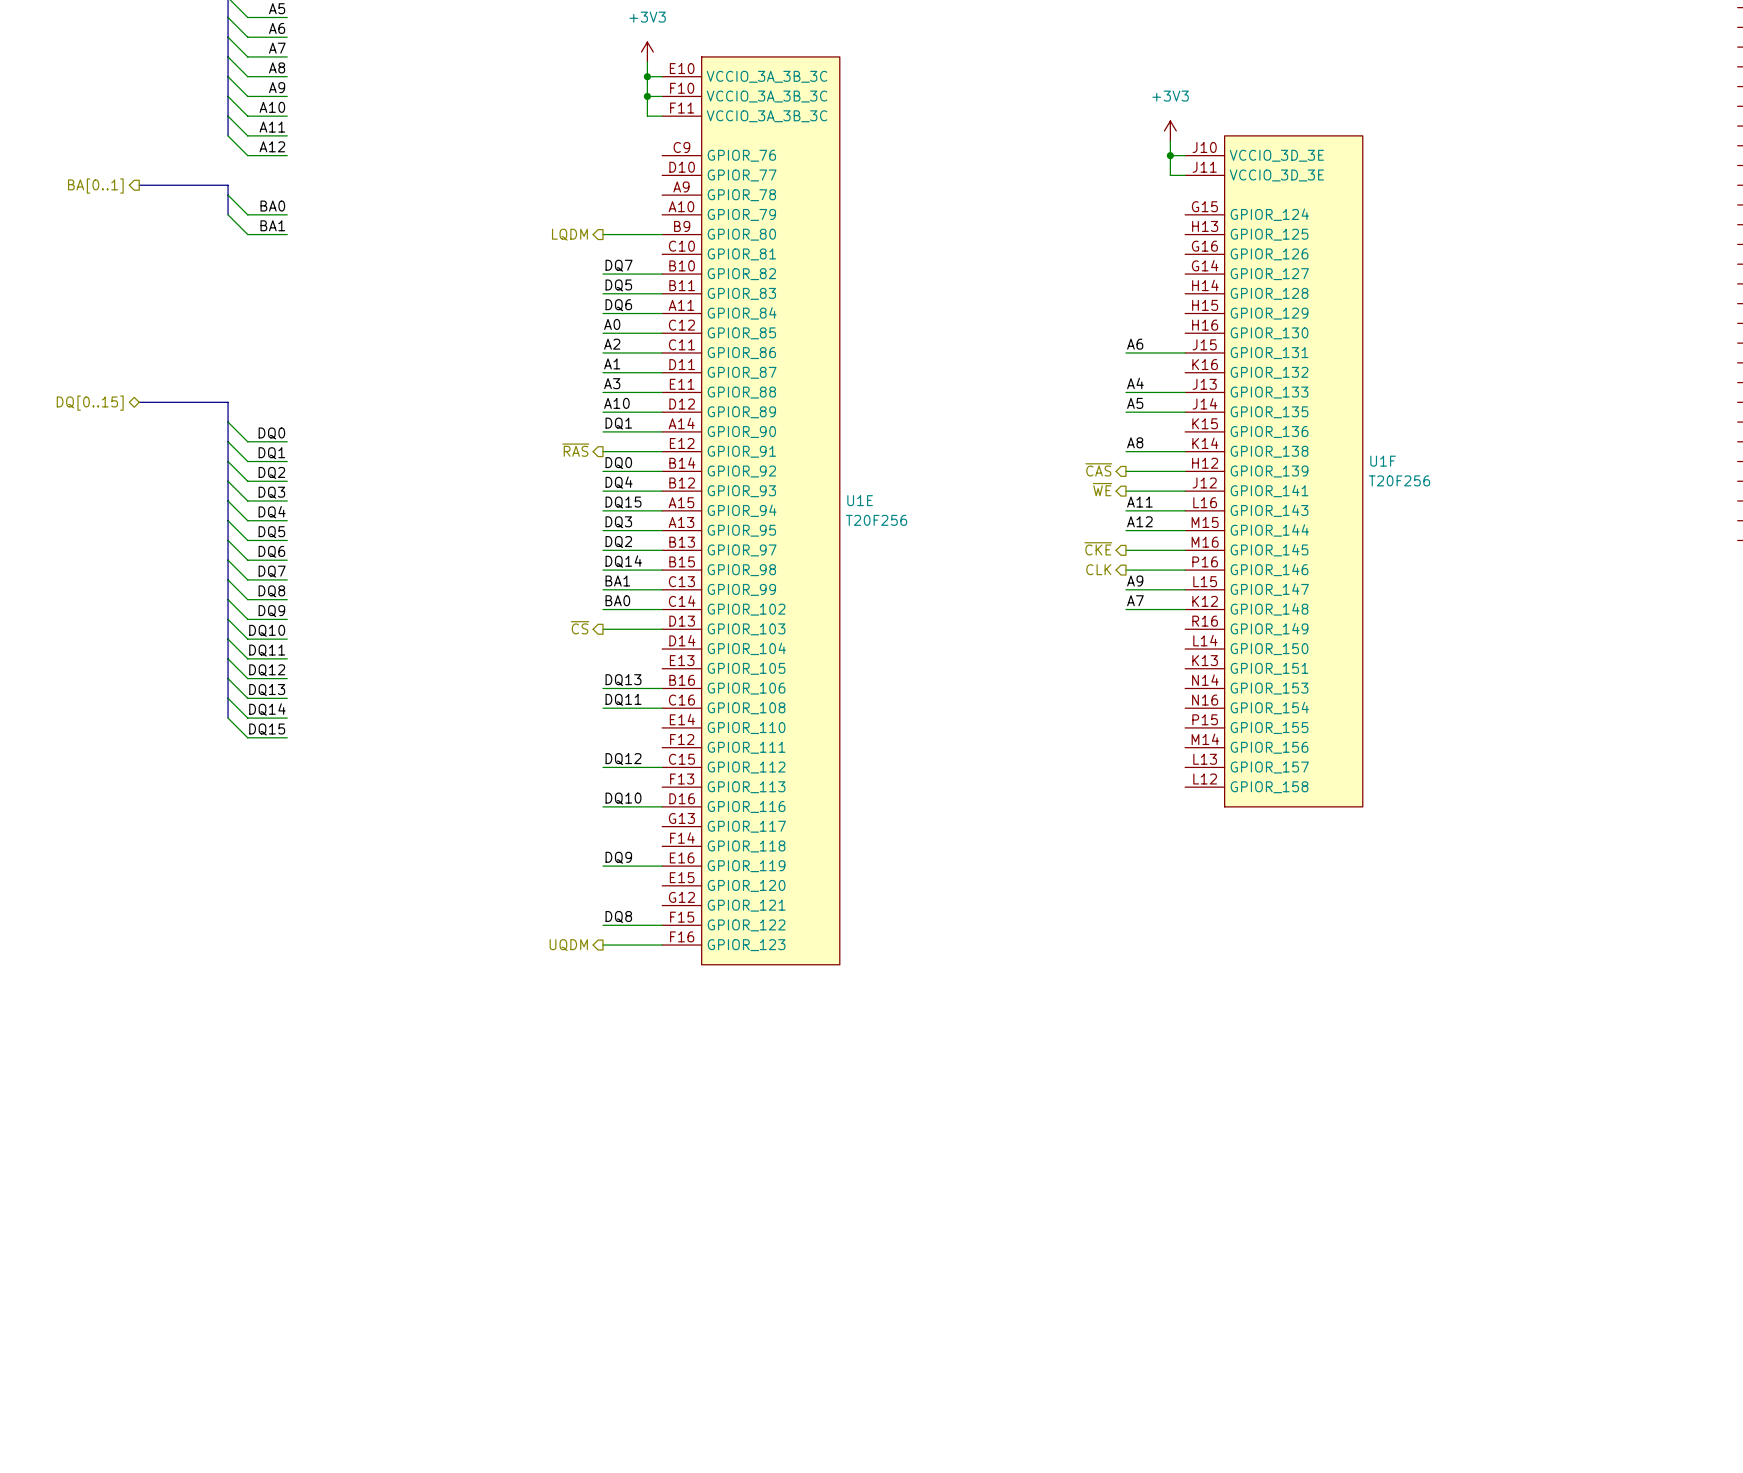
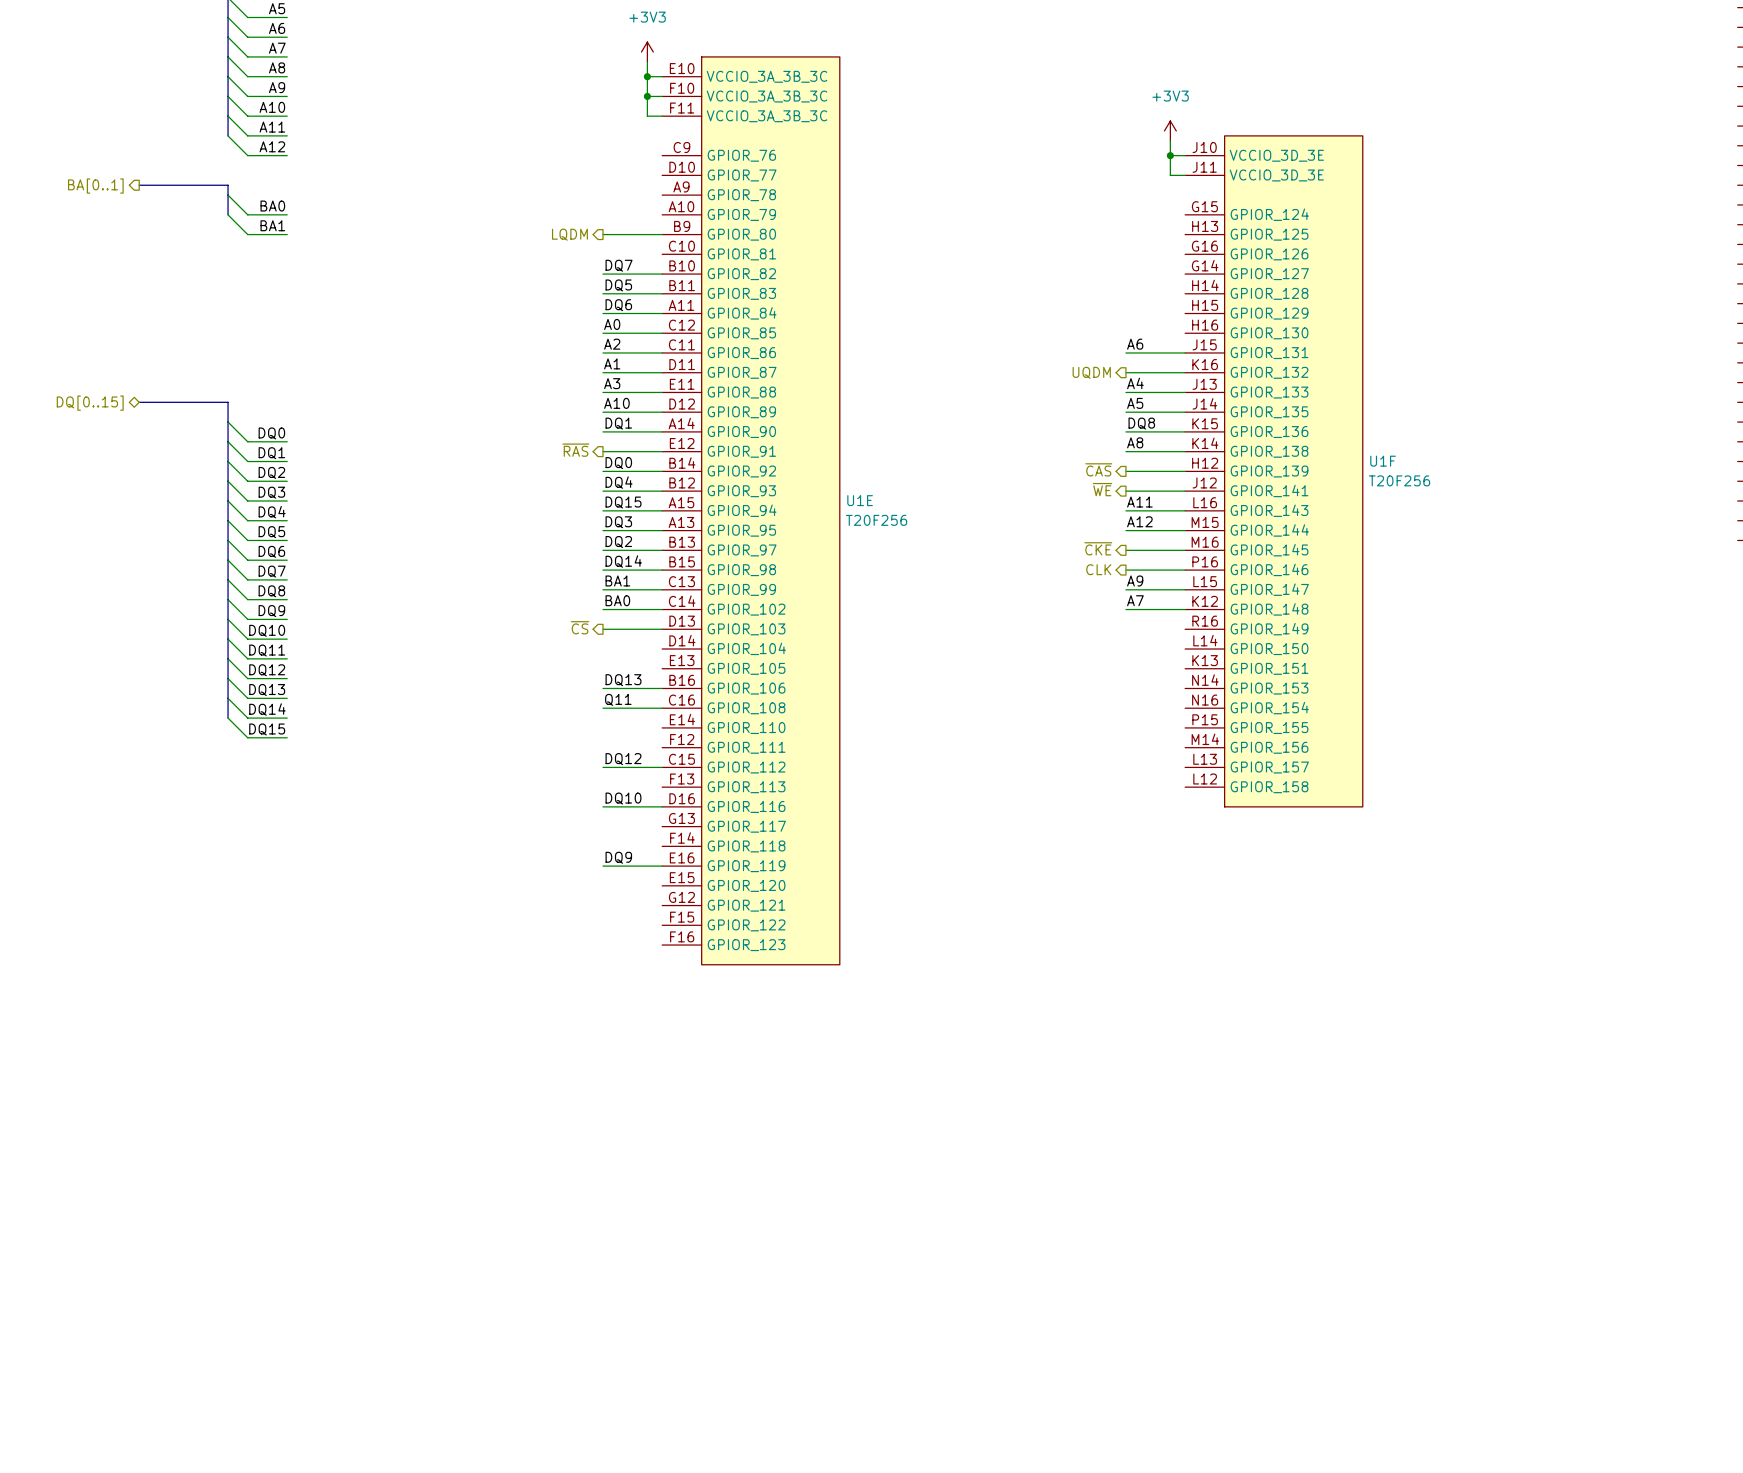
hierarchical label: none -> UQDM (1091, 372)
wire: none -> (1125, 372) (1185, 372)
label: none -> DQ8 (1141, 423)
wire: none -> (1125, 431) (1185, 431)
label: DQ11 (623, 699) -> Q11 (618, 699)
label: DQ8 (618, 916) -> none
wire: (602, 925) (662, 925) -> none
hierarchical label: UQDM (568, 945) -> none
wire: (602, 945) (662, 945) -> none

